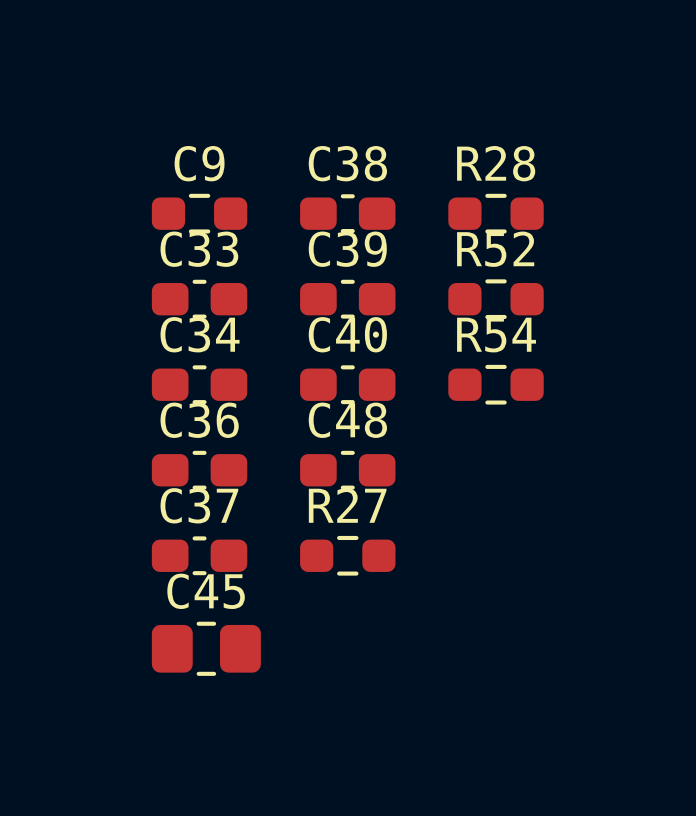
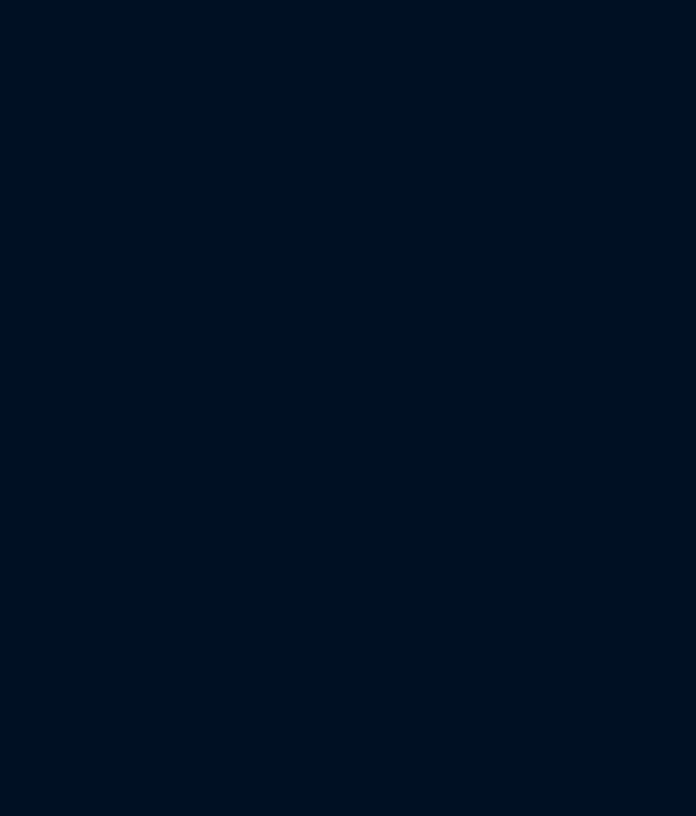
C9: (199, 213) -> none
C38: (347, 213) -> none
R28: (496, 213) -> none
C33: (199, 299) -> none
C39: (347, 299) -> none
R52: (496, 299) -> none
C34: (199, 384) -> none
C40: (347, 384) -> none
R54: (496, 384) -> none
C36: (199, 470) -> none
C48: (347, 470) -> none
C37: (199, 555) -> none
R27: (347, 555) -> none
C45: (206, 648) -> none

